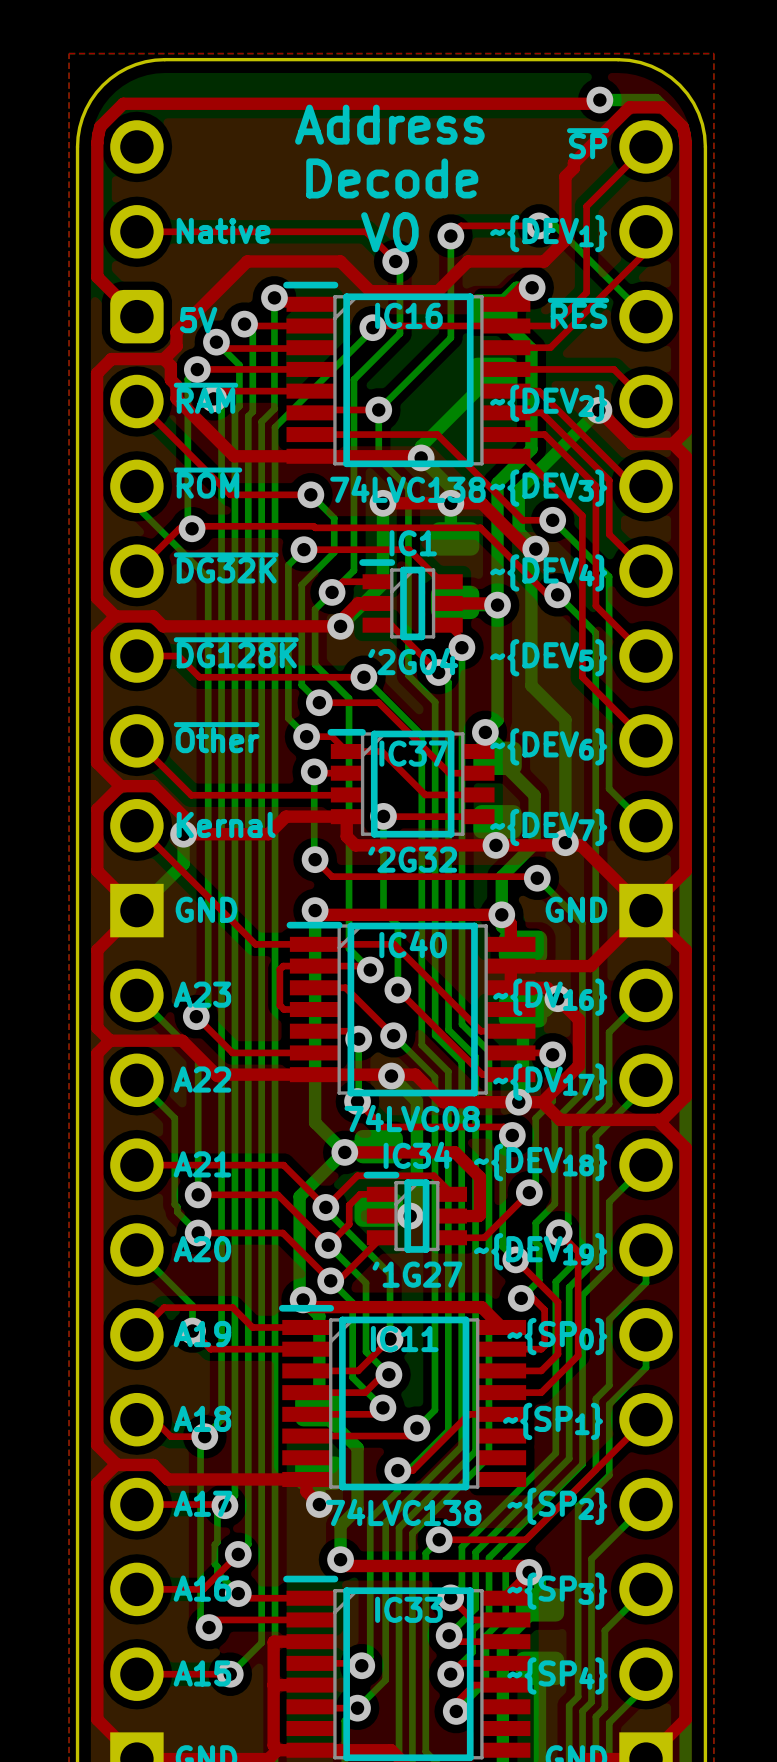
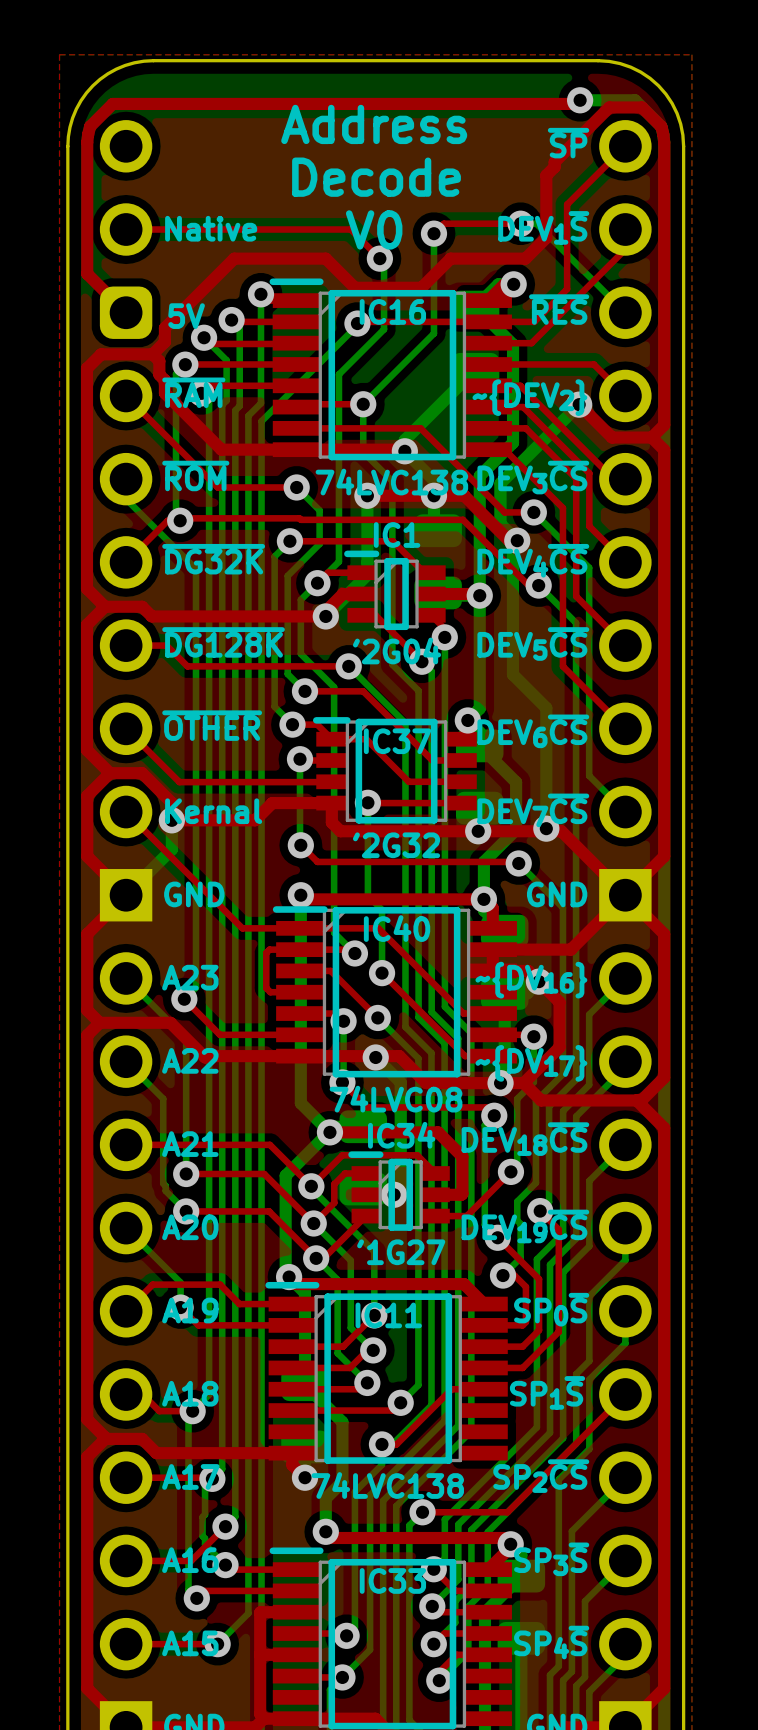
text: ~{DEV1} (548, 233) -> DEV1~{S} (543, 227)
text: ~{DEV3} (548, 488) -> DEV3~{CS} (533, 477)
text: ~{DEV4} (548, 572) -> DEV4~{CS} (533, 560)
text: ~{DEV5} (548, 657) -> DEV5~{CS} (533, 643)
text: ~{Other} (216, 737) -> ~{OTHER} (212, 725)
text: ~{DEV6} (548, 746) -> DEV6~{CS} (533, 731)
text: ~{DEV7} (548, 827) -> DEV7~{CS} (533, 810)
text: ~{DEV18} (540, 1162) -> DEV18~{CS} (525, 1139)
text: ~{DEV19} (540, 1251) -> DEV19~{CS} (525, 1226)
text: ~{SP0} (557, 1336) -> SP0~{S} (551, 1309)
text: ~{SP1} (553, 1421) -> SP1~{S} (547, 1392)
text: ~{SP2} (557, 1506) -> SP2~{CS} (541, 1476)
text: ~{SP3} (557, 1591) -> SP3~{S} (551, 1559)
text: ~{SP4} (557, 1675) -> SP4~{S} (551, 1642)

